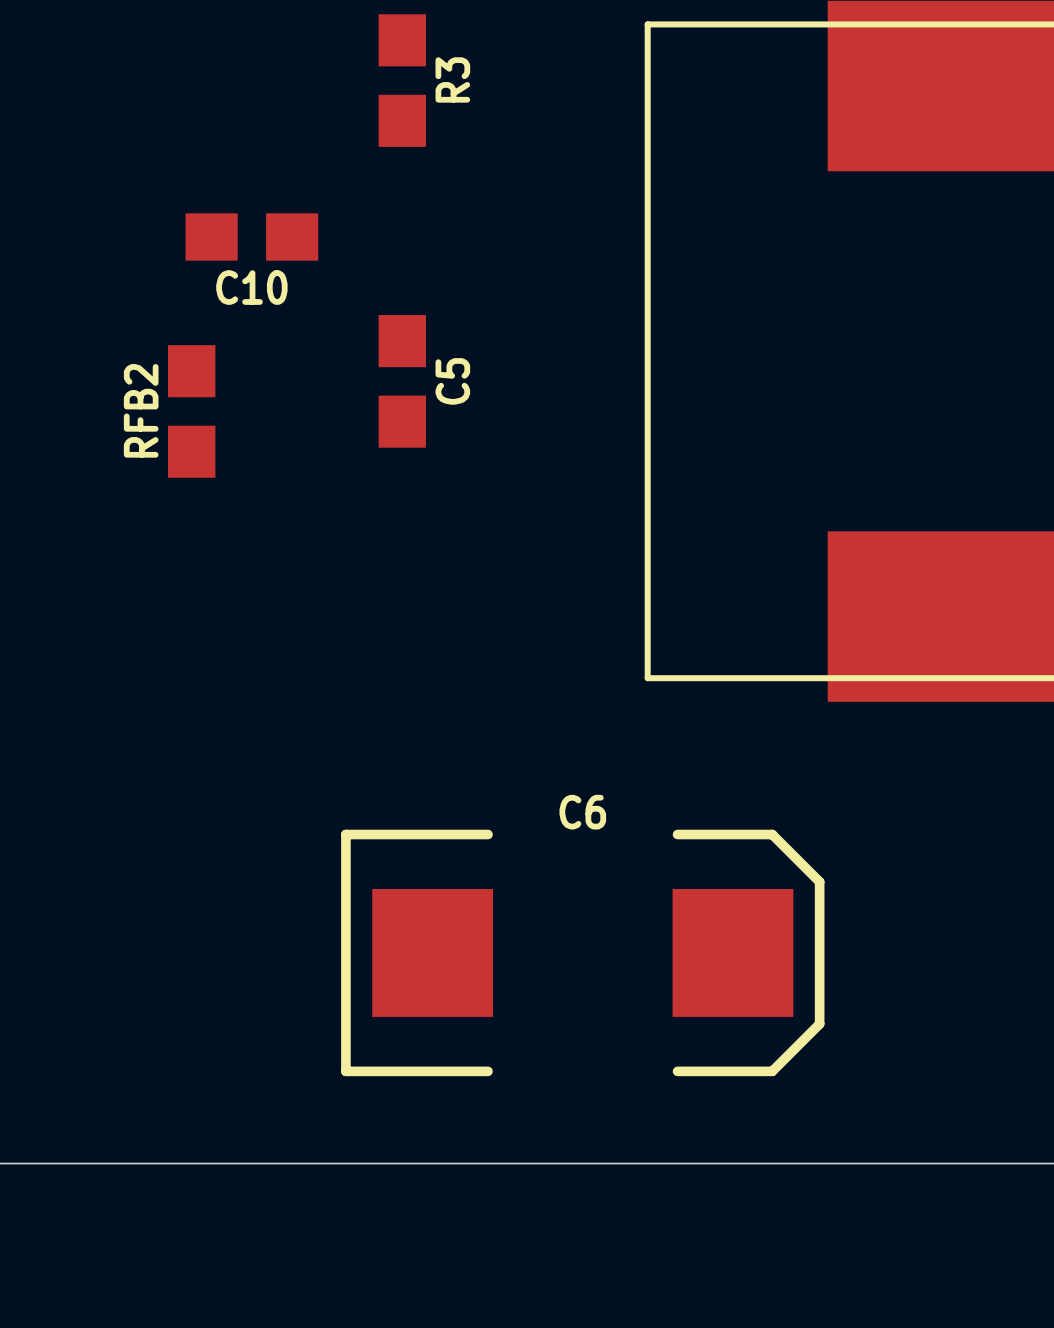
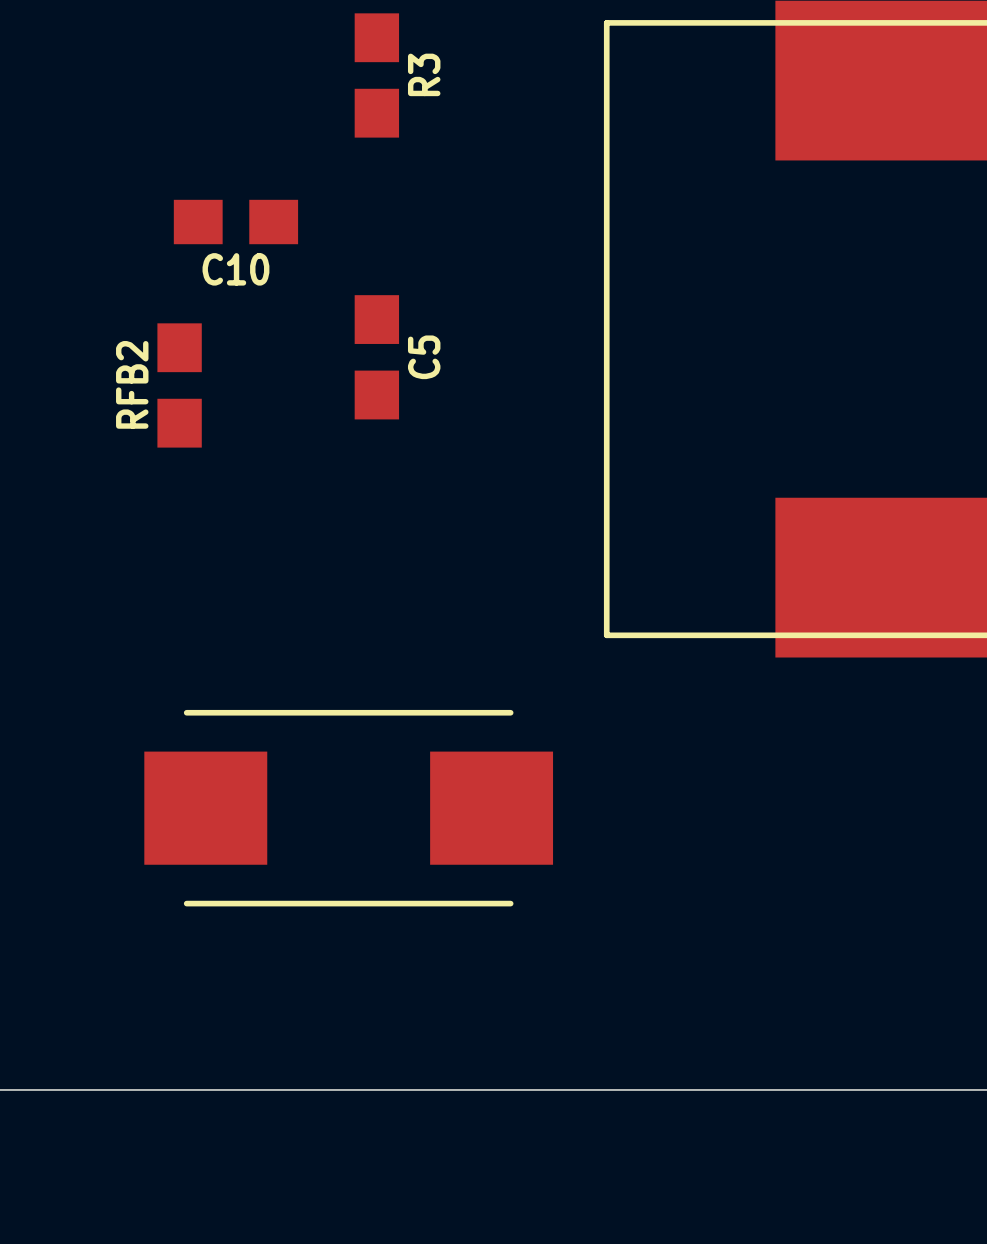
part: none -> (348, 808)
C6: (582, 952) -> none

